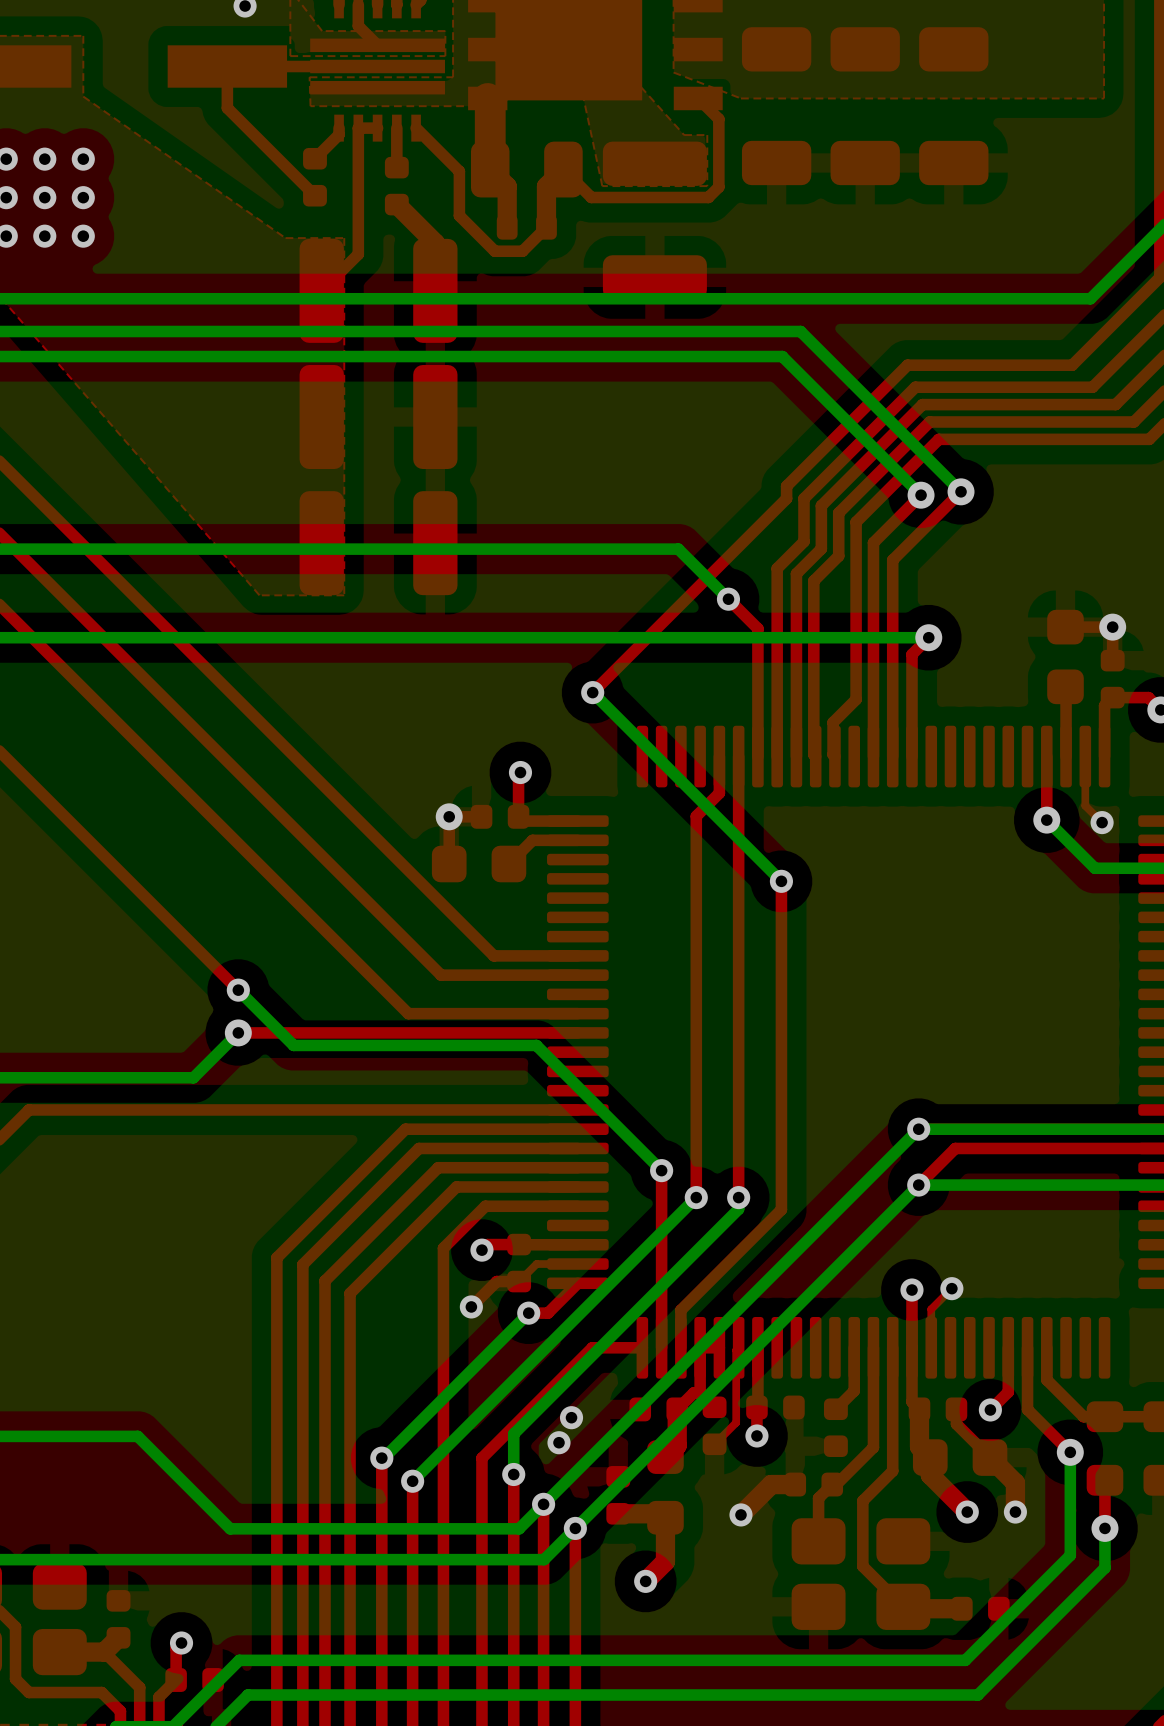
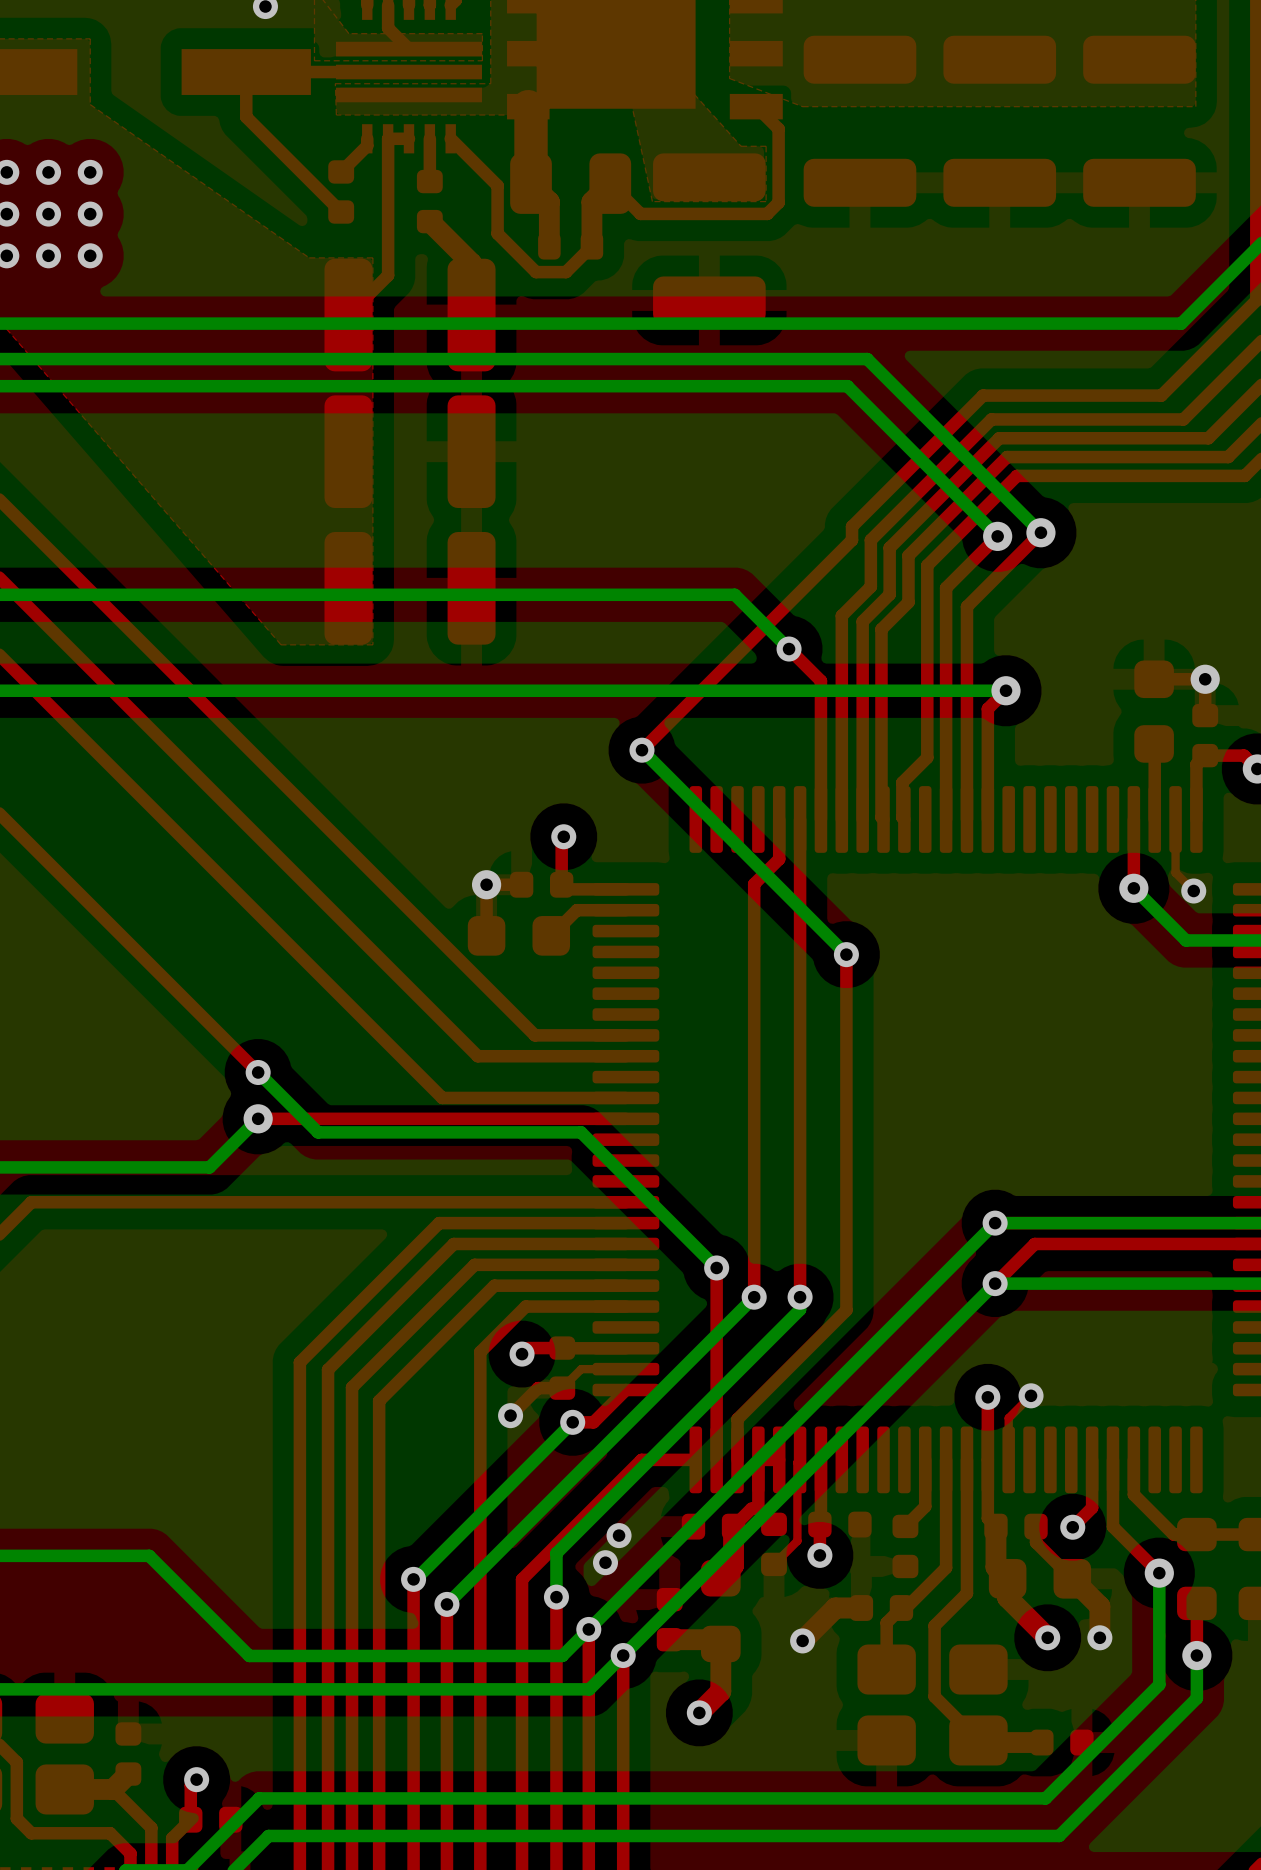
part footprint: [741, 27, 812, 186] -> [803, 35, 917, 207]
part: (865, 106) -> none
part: (953, 106) -> none
part: none -> (999, 121)
part: none -> (1139, 121)

